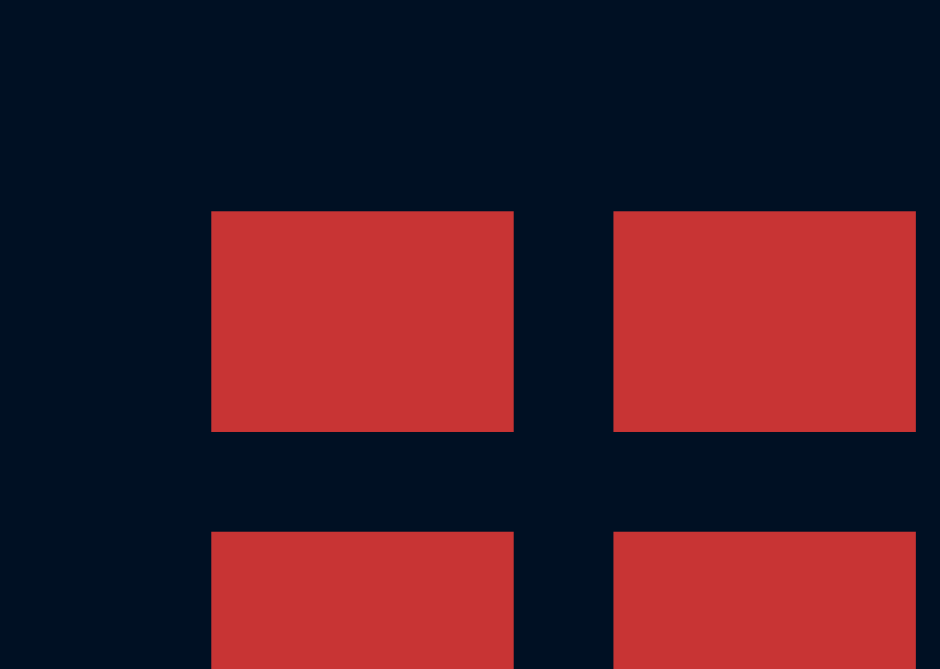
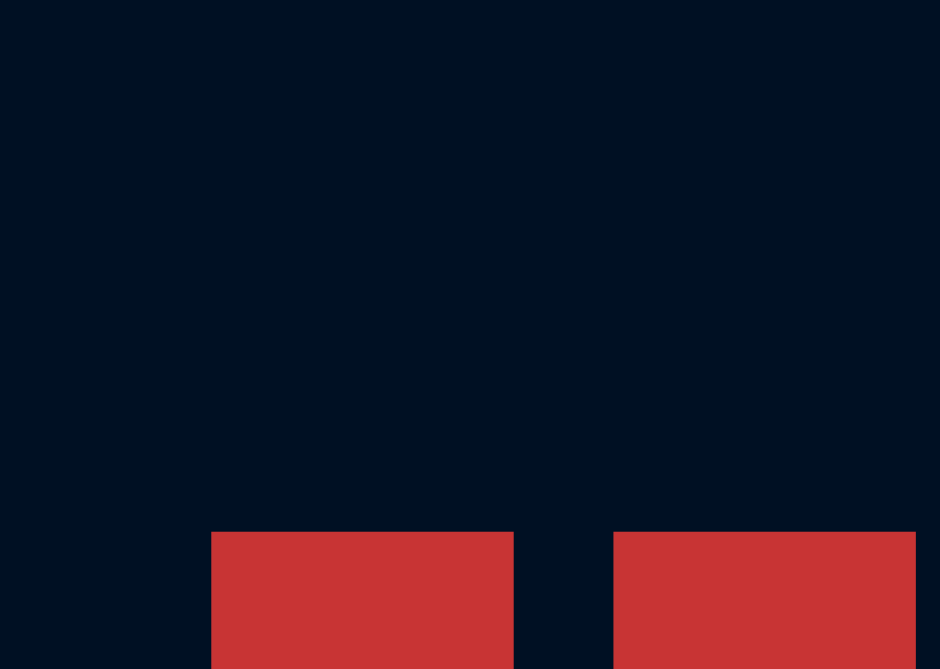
part: (362, 321) -> none
part: (764, 321) -> none

